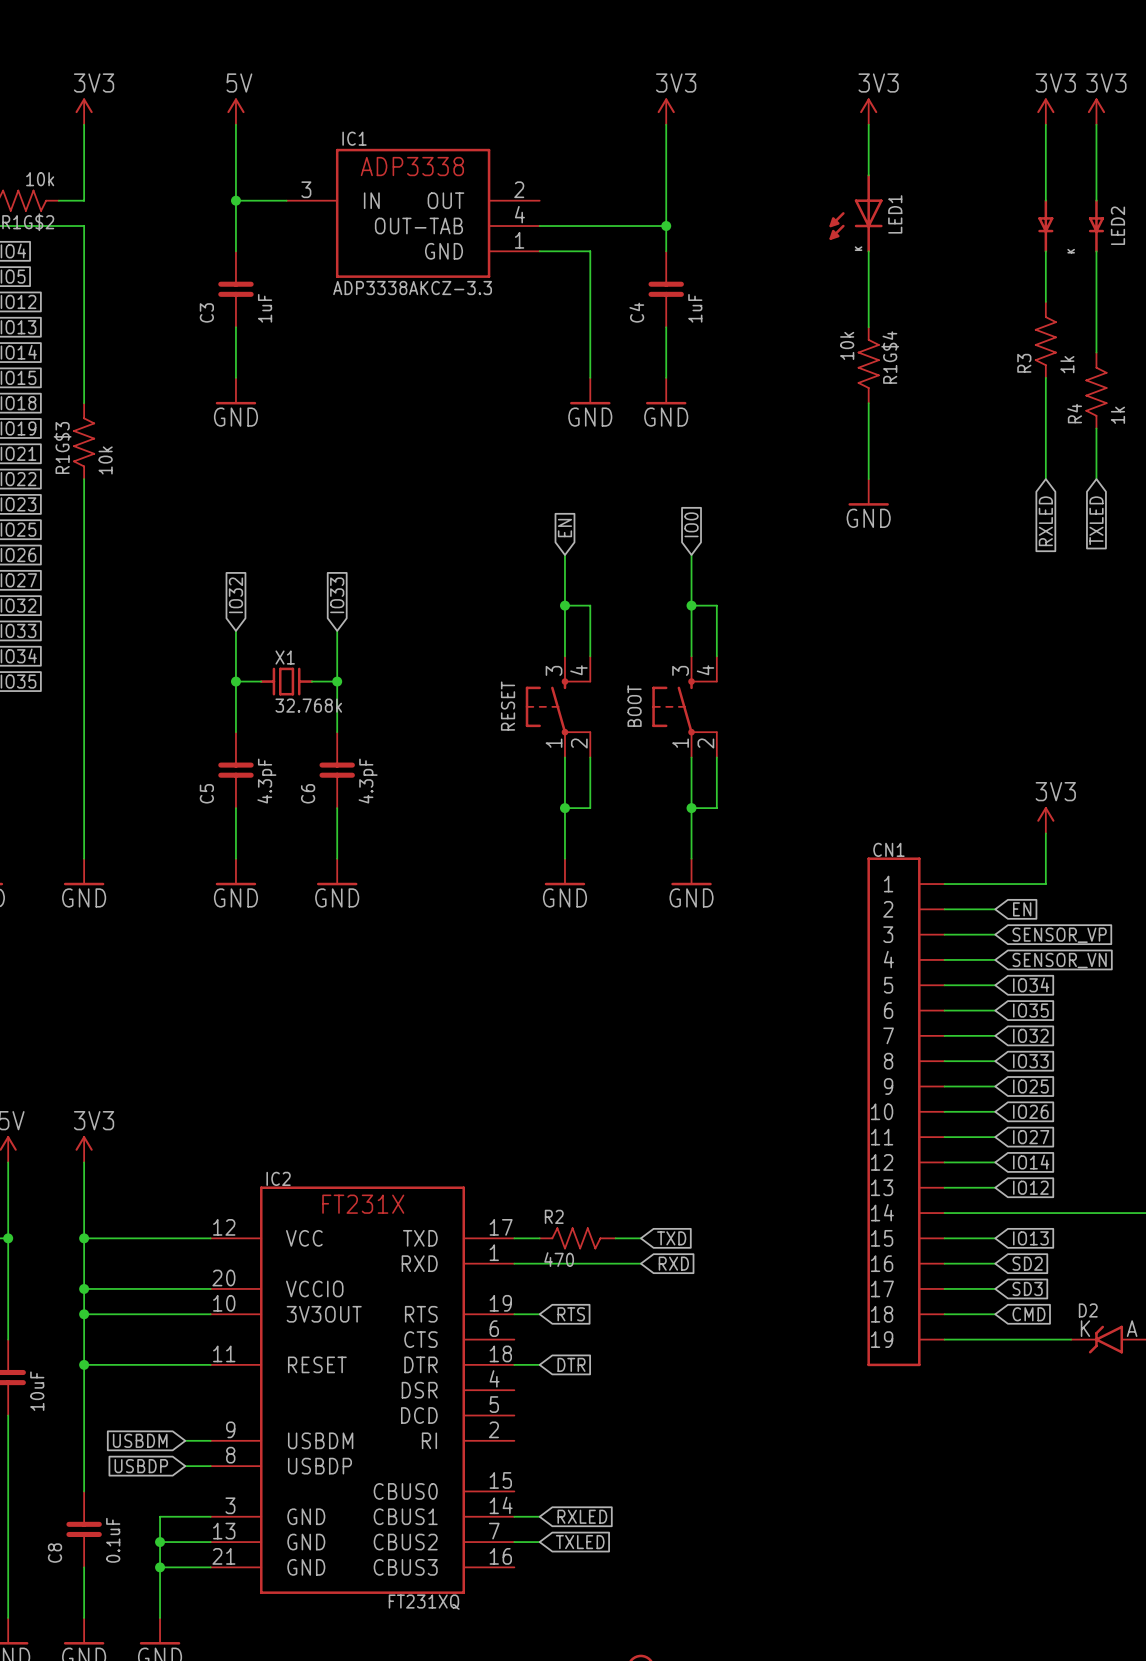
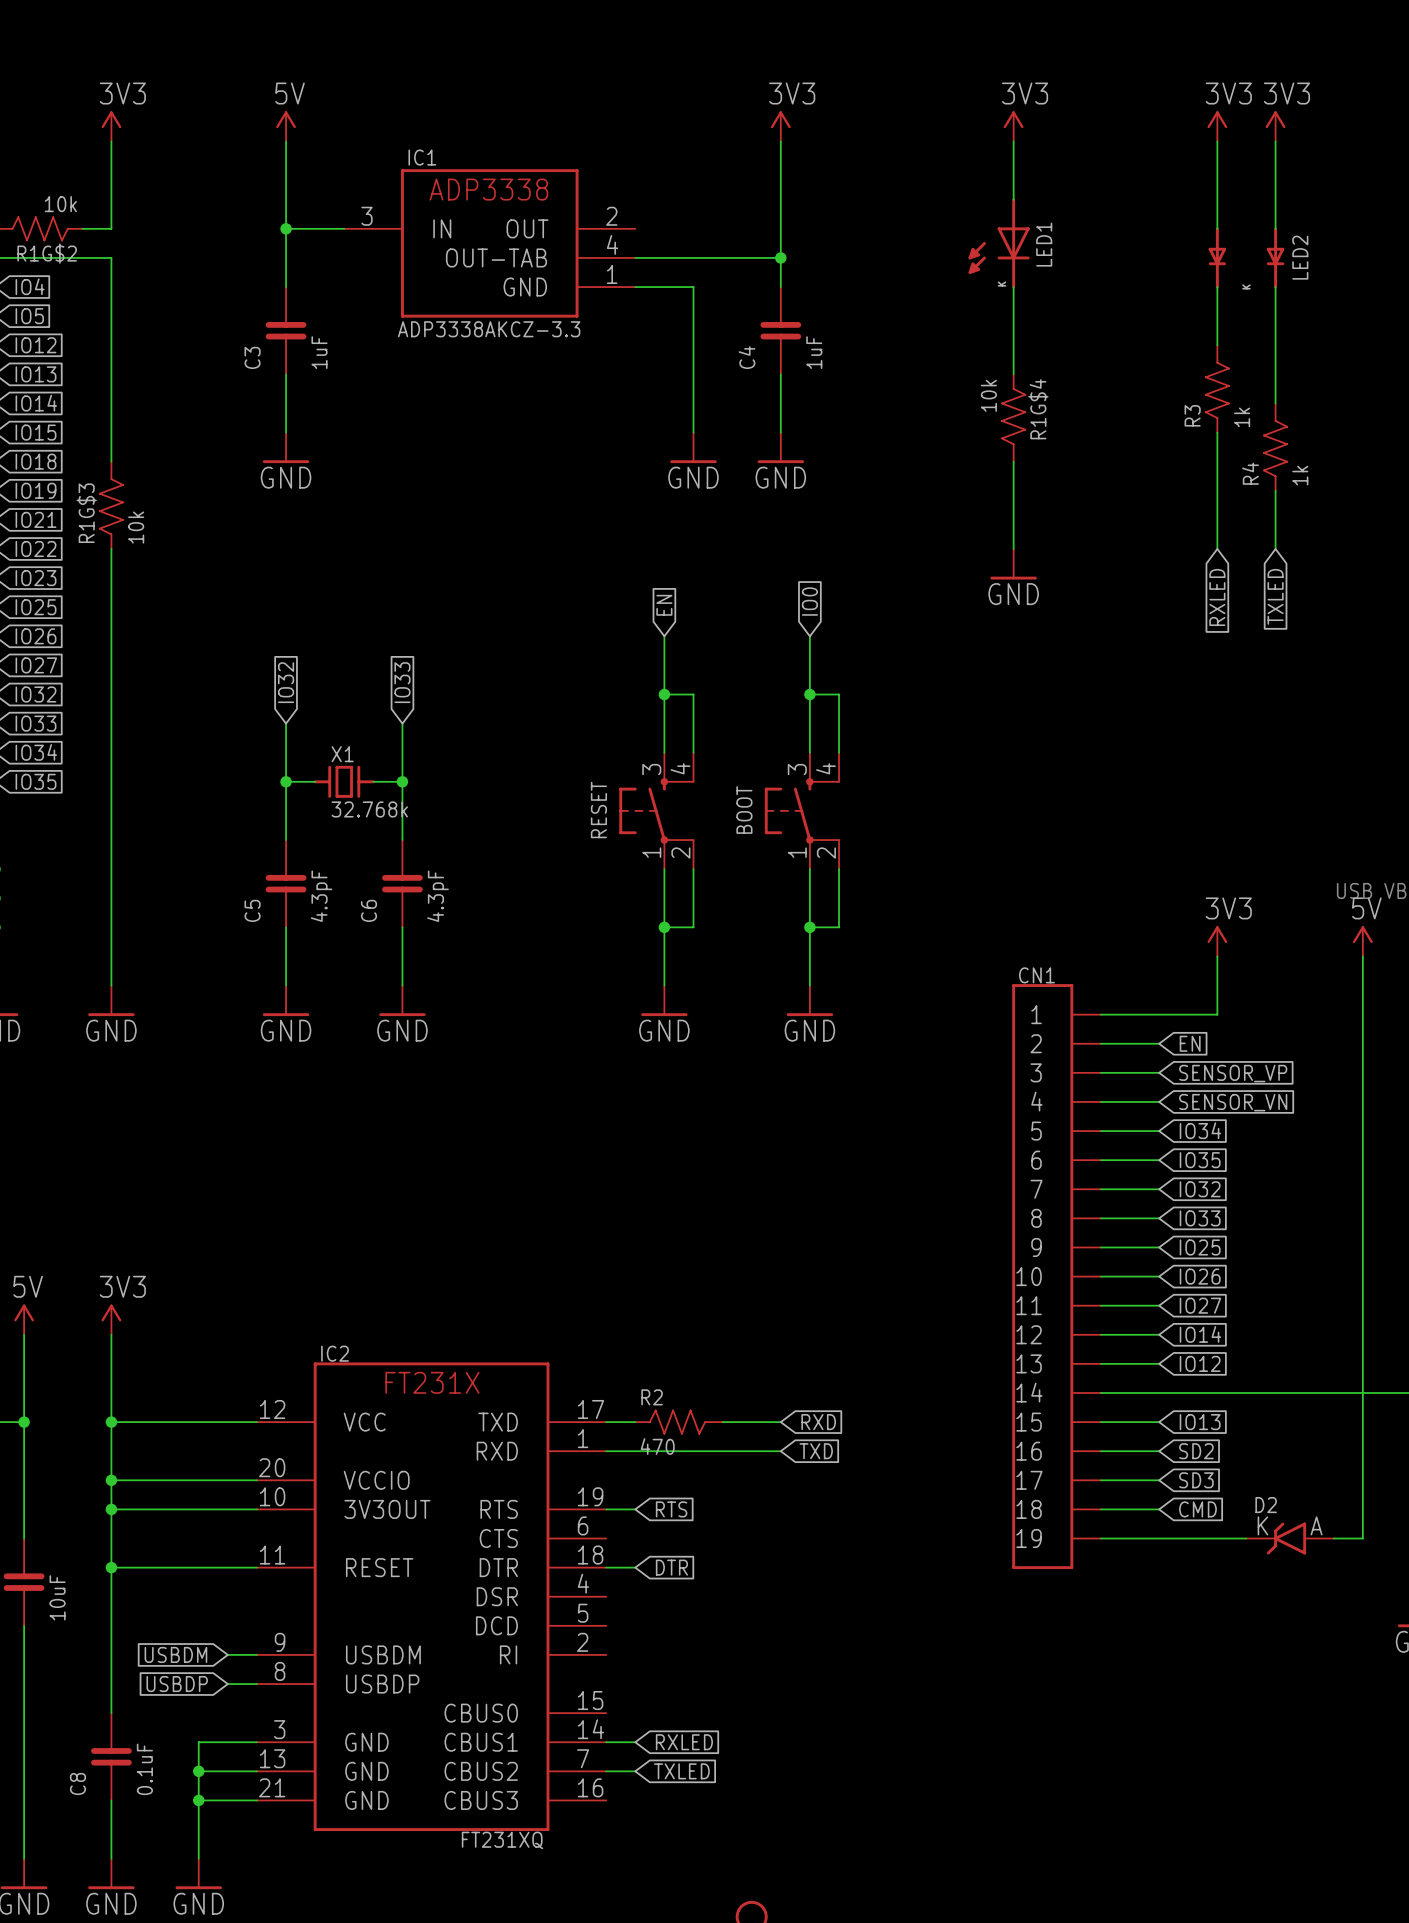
wire: none -> (751, 1422) (780, 1422)
global label position: TXD (671, 1238) -> TXD (816, 1451)
wire: none -> (751, 1451) (780, 1451)
global label position: RXD (673, 1263) -> RXD (818, 1422)

